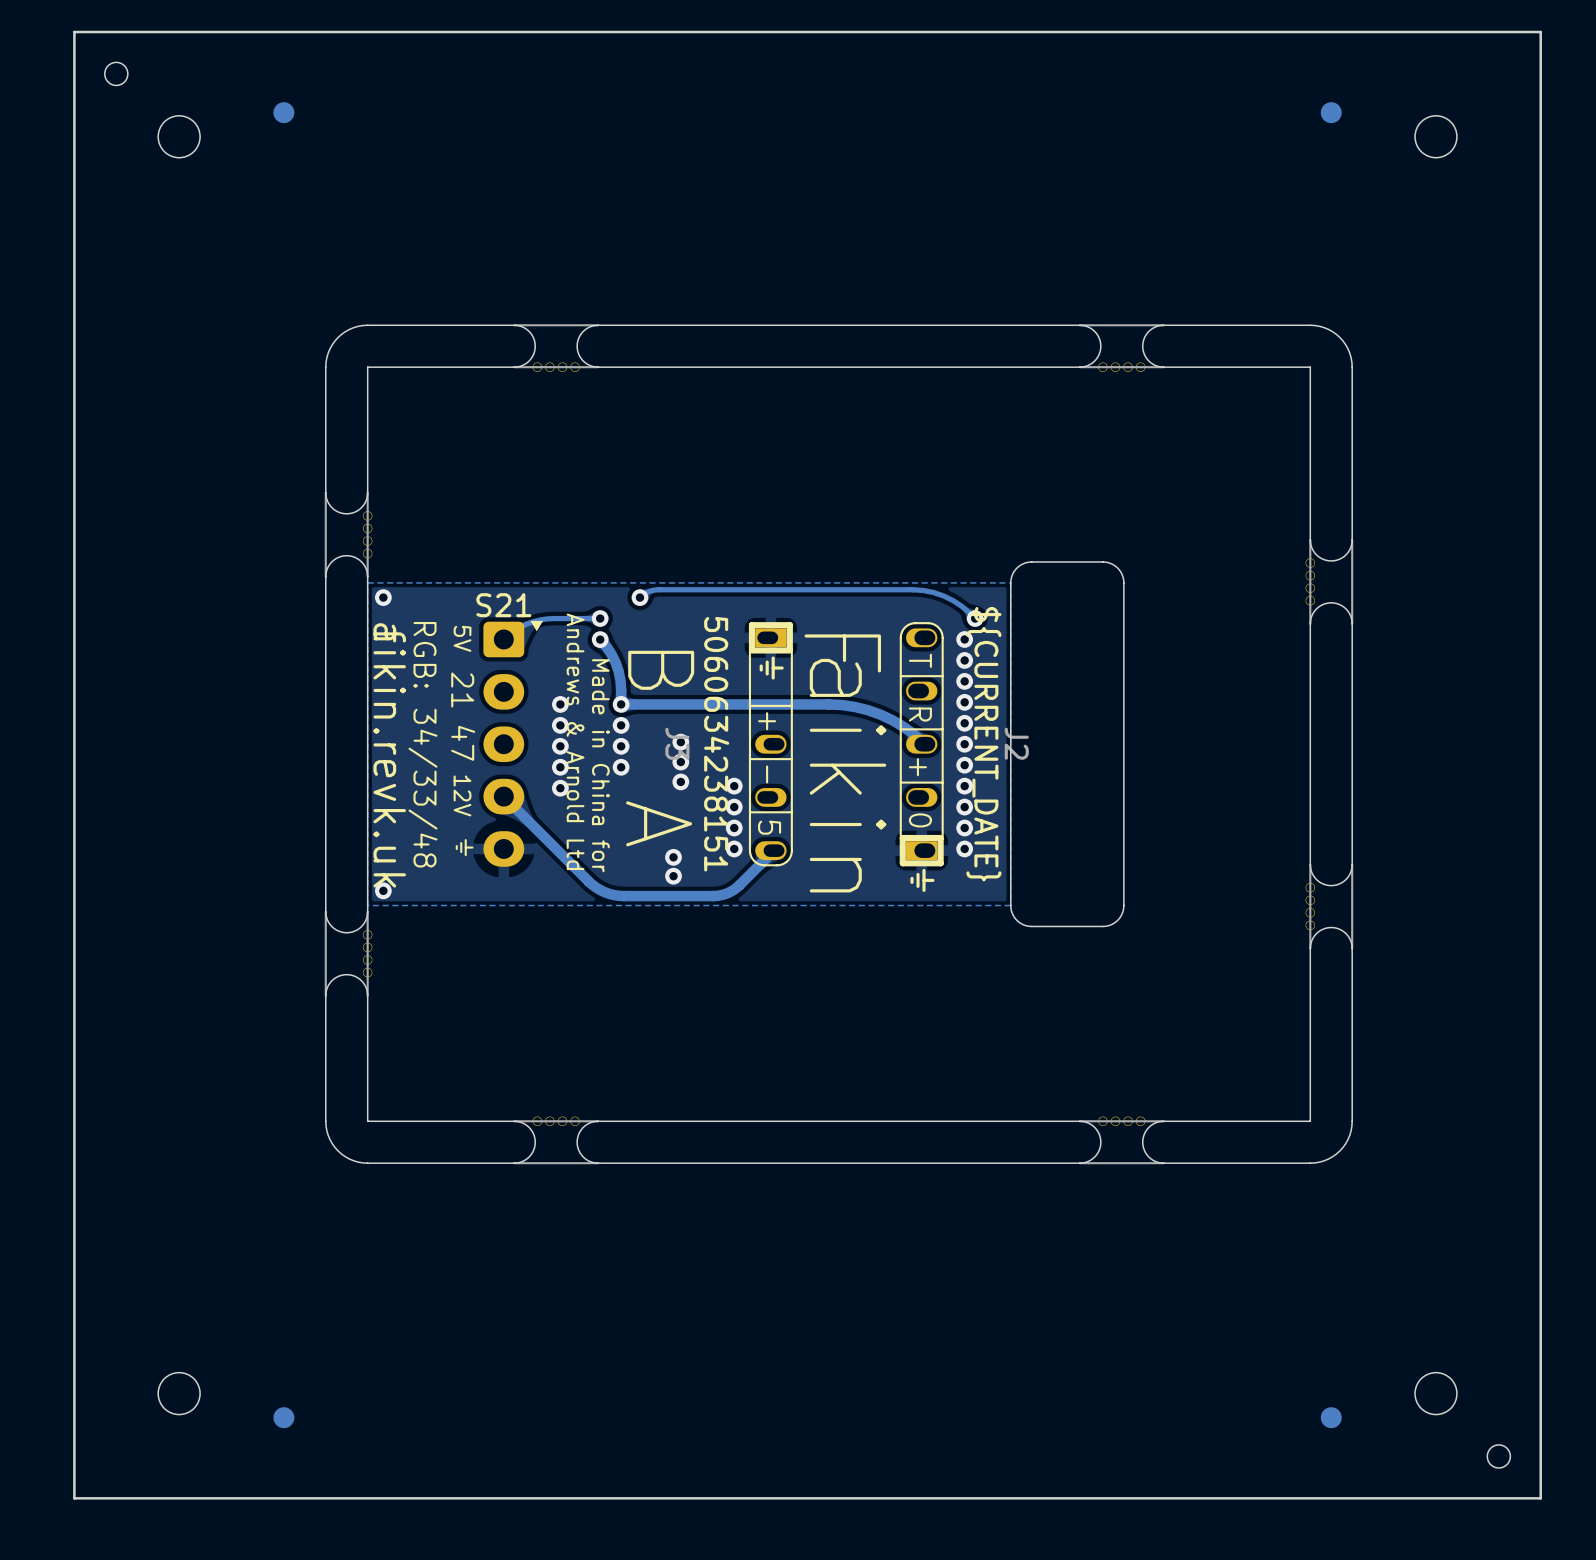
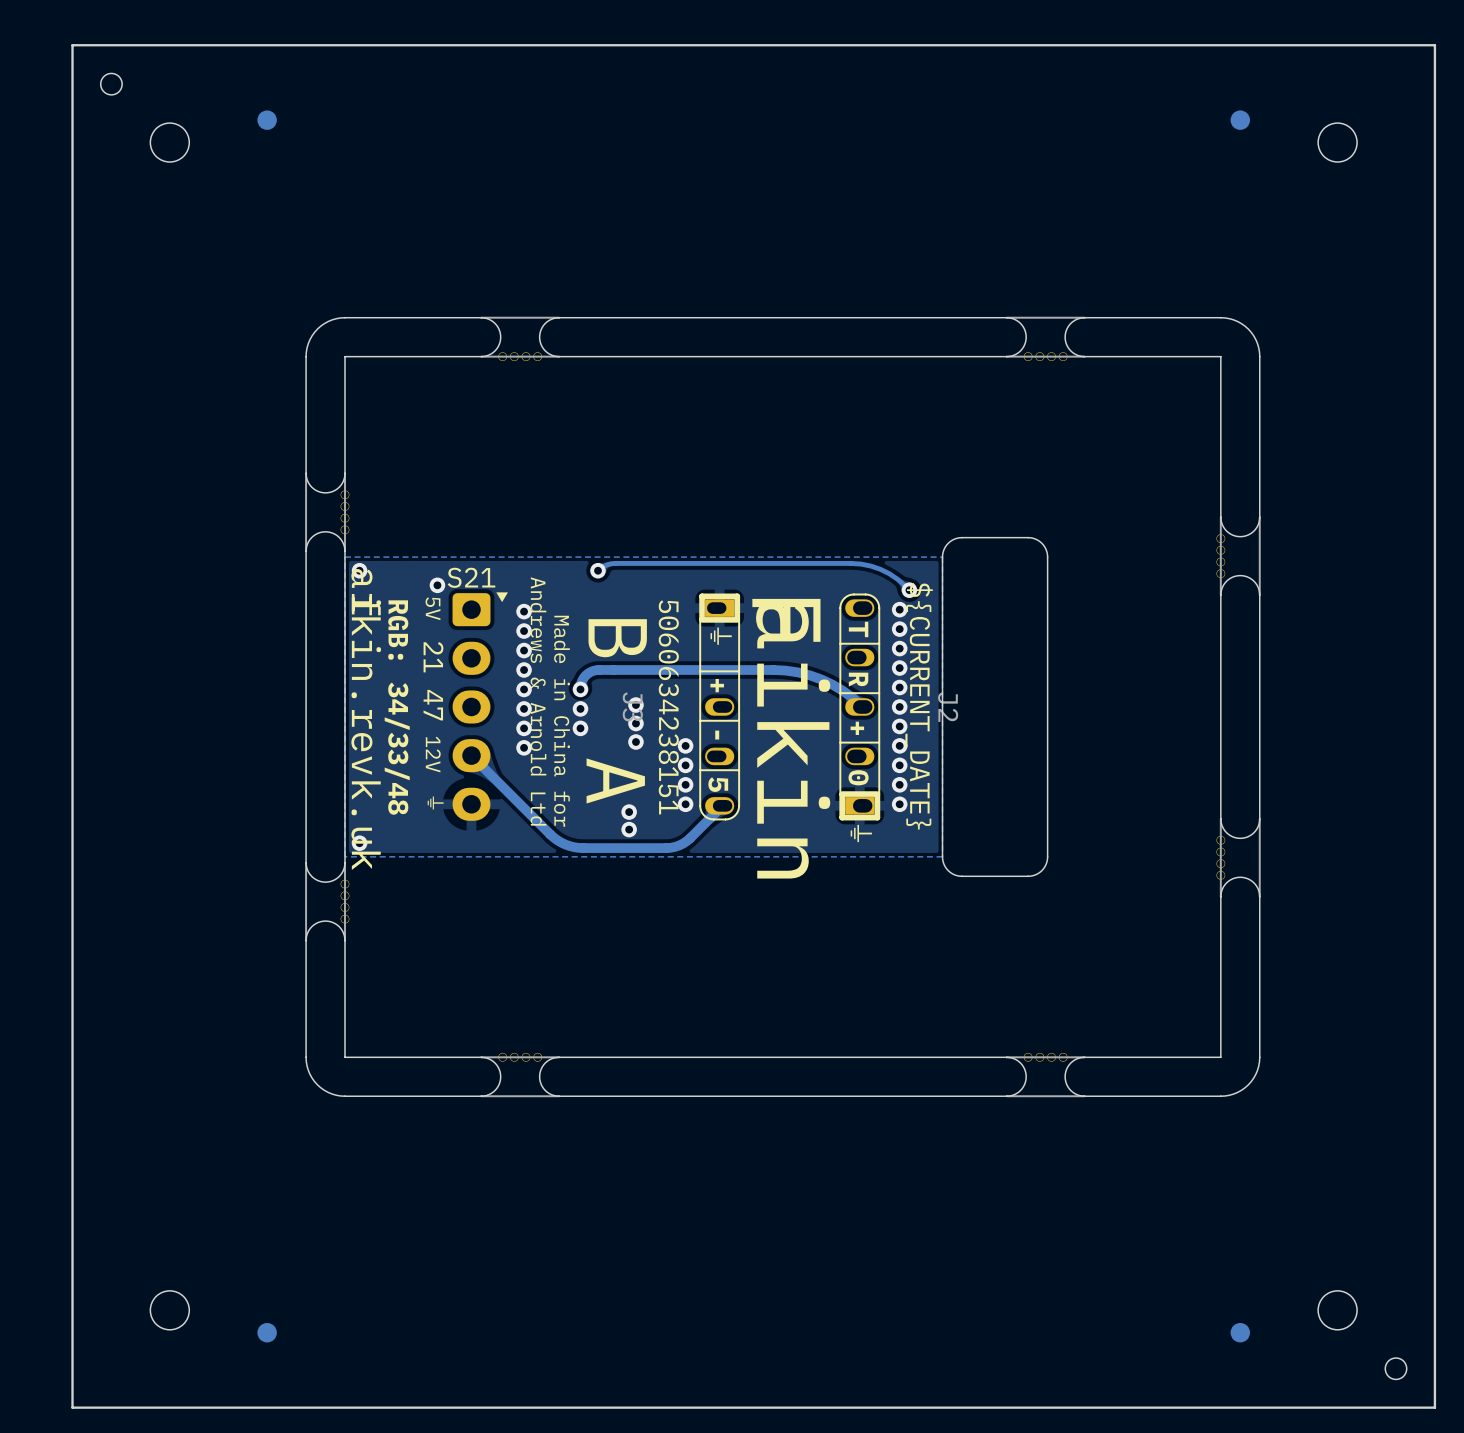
via: none -> (437, 585)
track: (600, 618) (540, 619) (520, 626) (503, 639) -> none
via: (600, 618) -> none
track: (600, 639) (611, 654) (618, 671) (621, 704) (641, 704) -> (580, 688) (585, 675) (598, 669)
via: (600, 639) -> none
via: none -> (524, 611)
via: none -> (524, 631)
via: none -> (524, 650)
via: (621, 704) -> none

